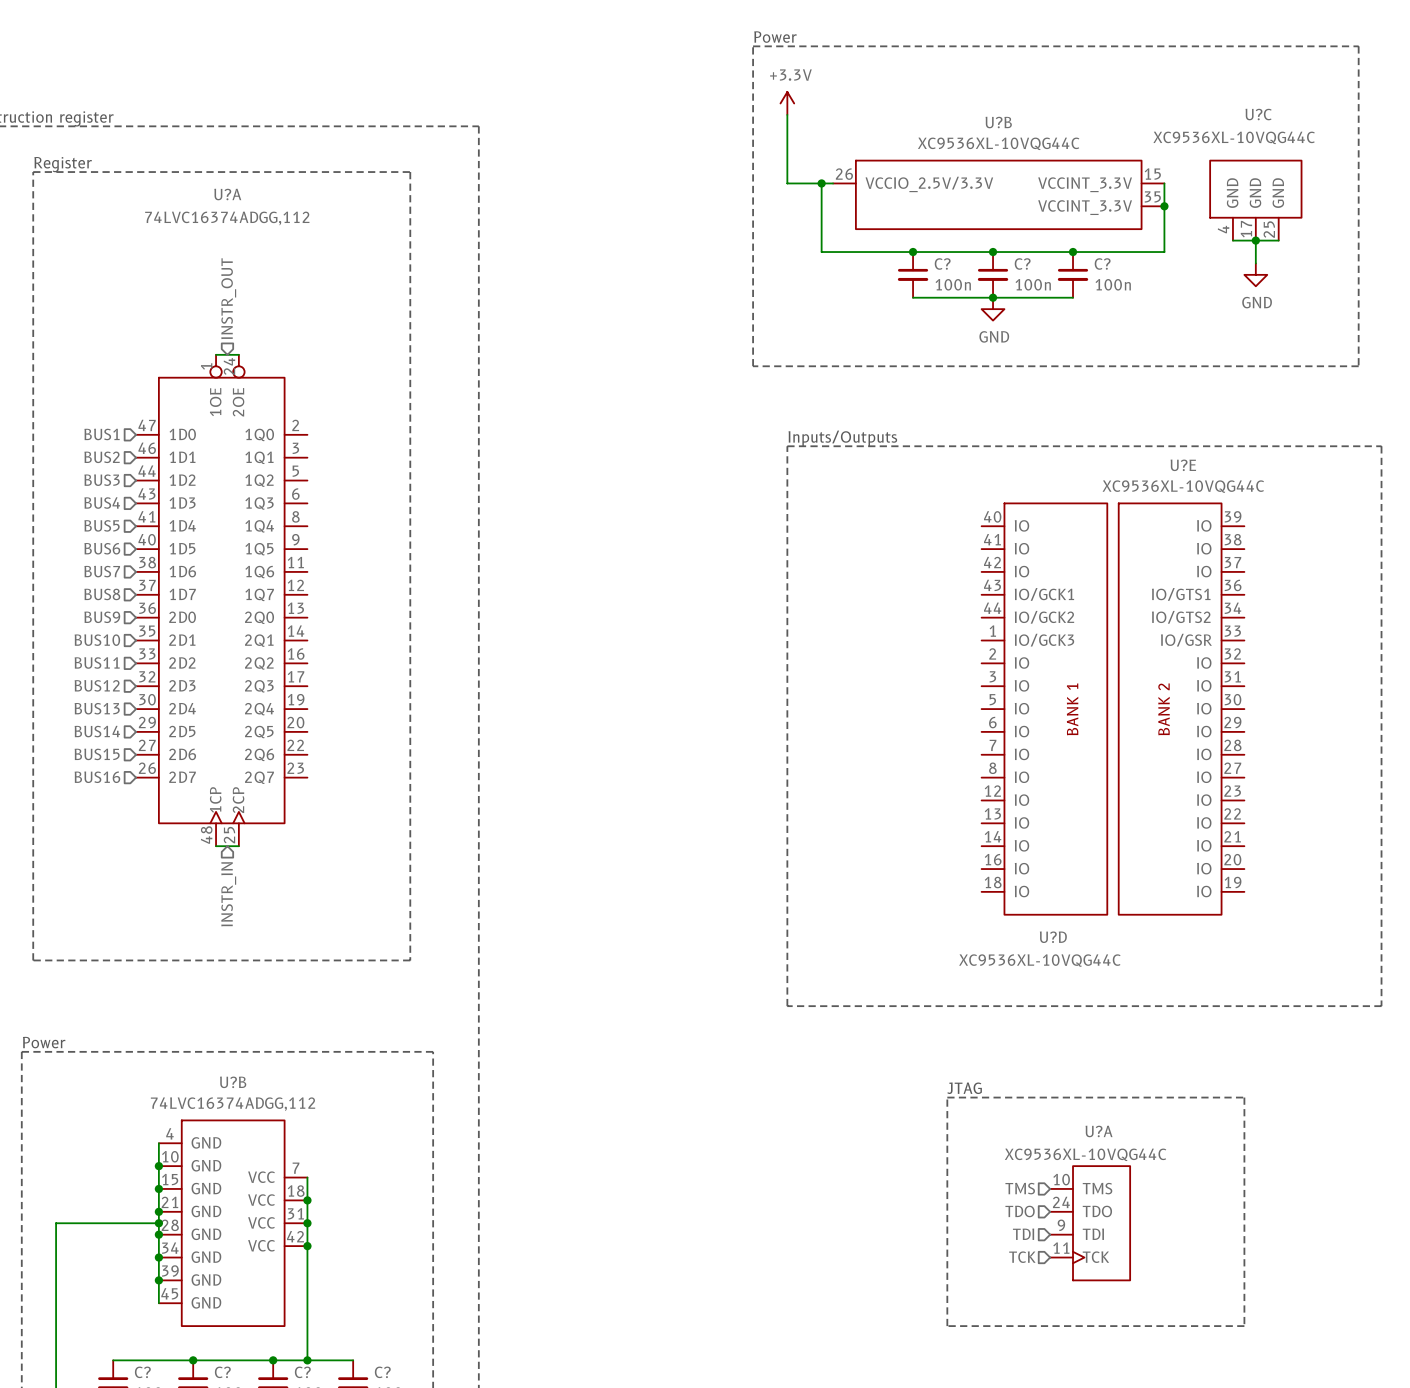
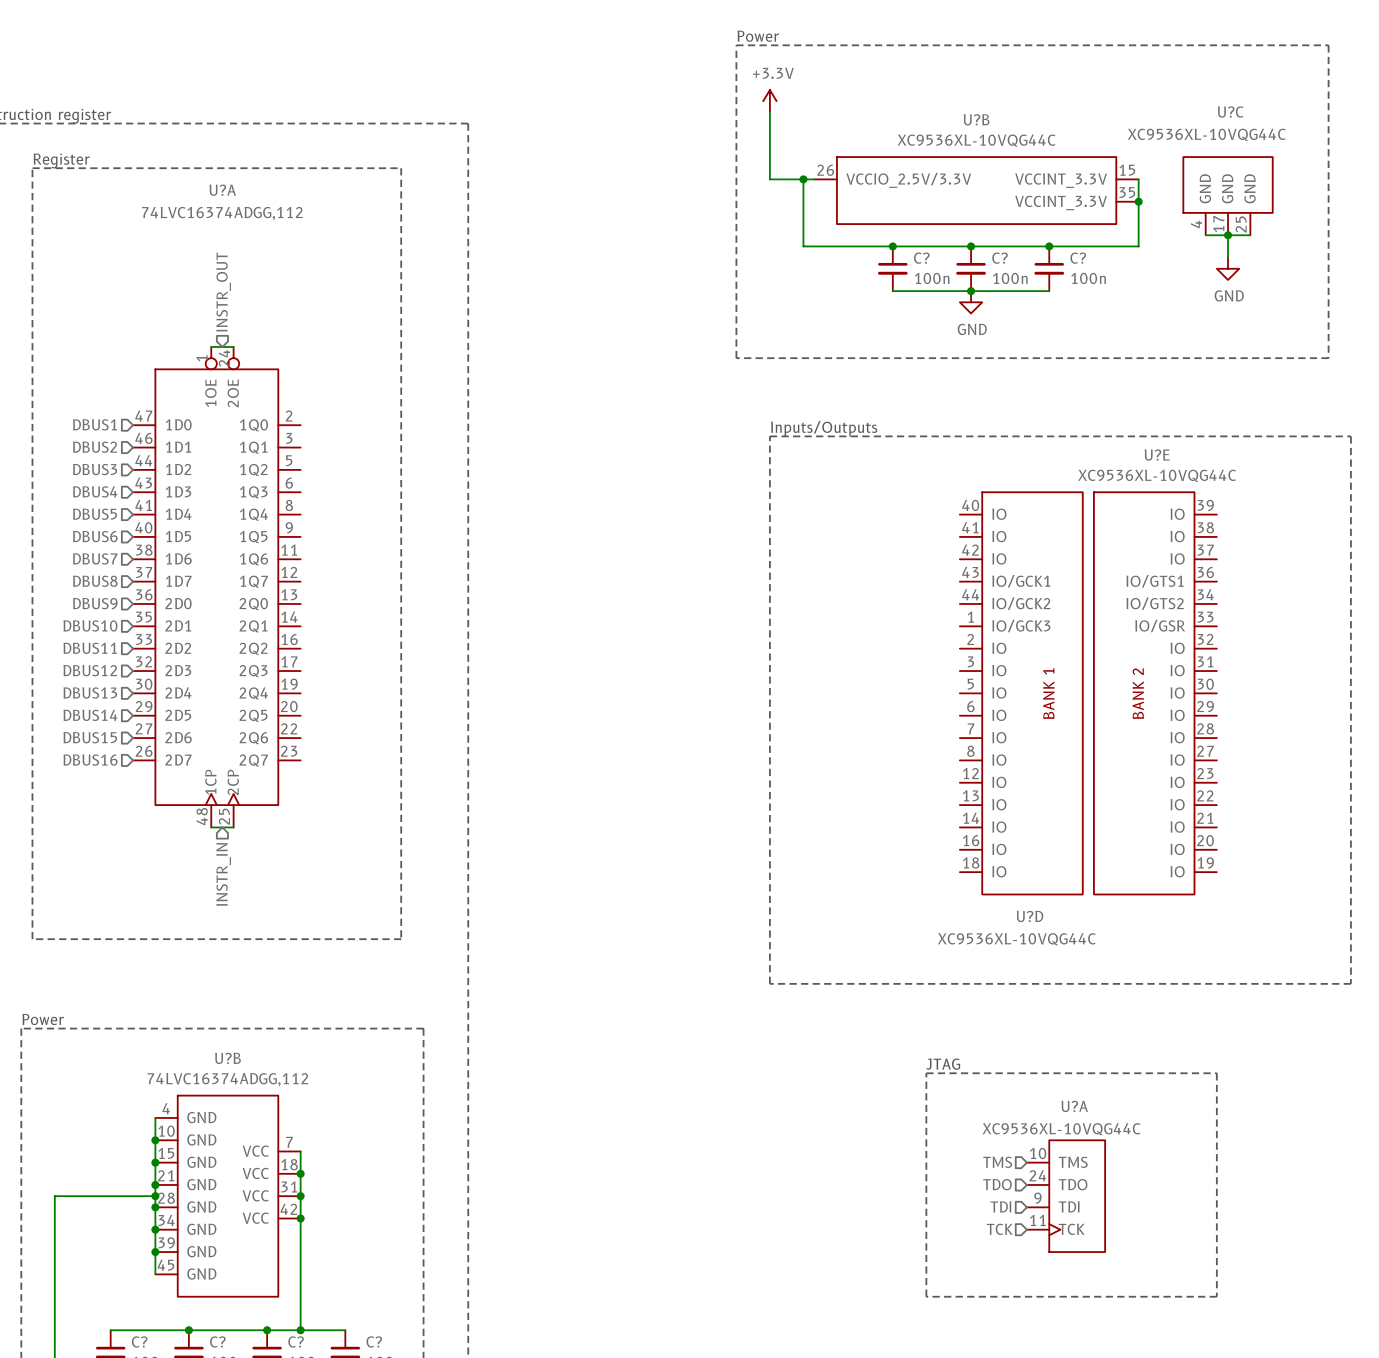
hierarchical label: BUS1 (102, 434) -> DBUS1 (95, 424)
hierarchical label: BUS2 (102, 457) -> DBUS2 (95, 447)
hierarchical label: BUS3 (102, 480) -> DBUS3 (95, 469)
hierarchical label: BUS4 (102, 503) -> DBUS4 (95, 491)
hierarchical label: BUS5 (102, 525) -> DBUS5 (95, 514)
hierarchical label: BUS6 (102, 548) -> DBUS6 (95, 536)
hierarchical label: BUS7 (102, 571) -> DBUS7 (95, 558)
hierarchical label: BUS8 (102, 594) -> DBUS8 (95, 581)
hierarchical label: BUS9 (102, 617) -> DBUS9 (95, 603)
hierarchical label: BUS10 (97, 640) -> DBUS10 (90, 625)
hierarchical label: BUS11 (97, 662) -> DBUS11 (90, 648)
hierarchical label: BUS12 (97, 685) -> DBUS12 (90, 670)
hierarchical label: BUS13 (97, 708) -> DBUS13 (90, 693)
hierarchical label: BUS14 (97, 731) -> DBUS14 (90, 715)
hierarchical label: BUS15 (97, 754) -> DBUS15 (90, 737)
hierarchical label: BUS16 (97, 777) -> DBUS16 (90, 760)

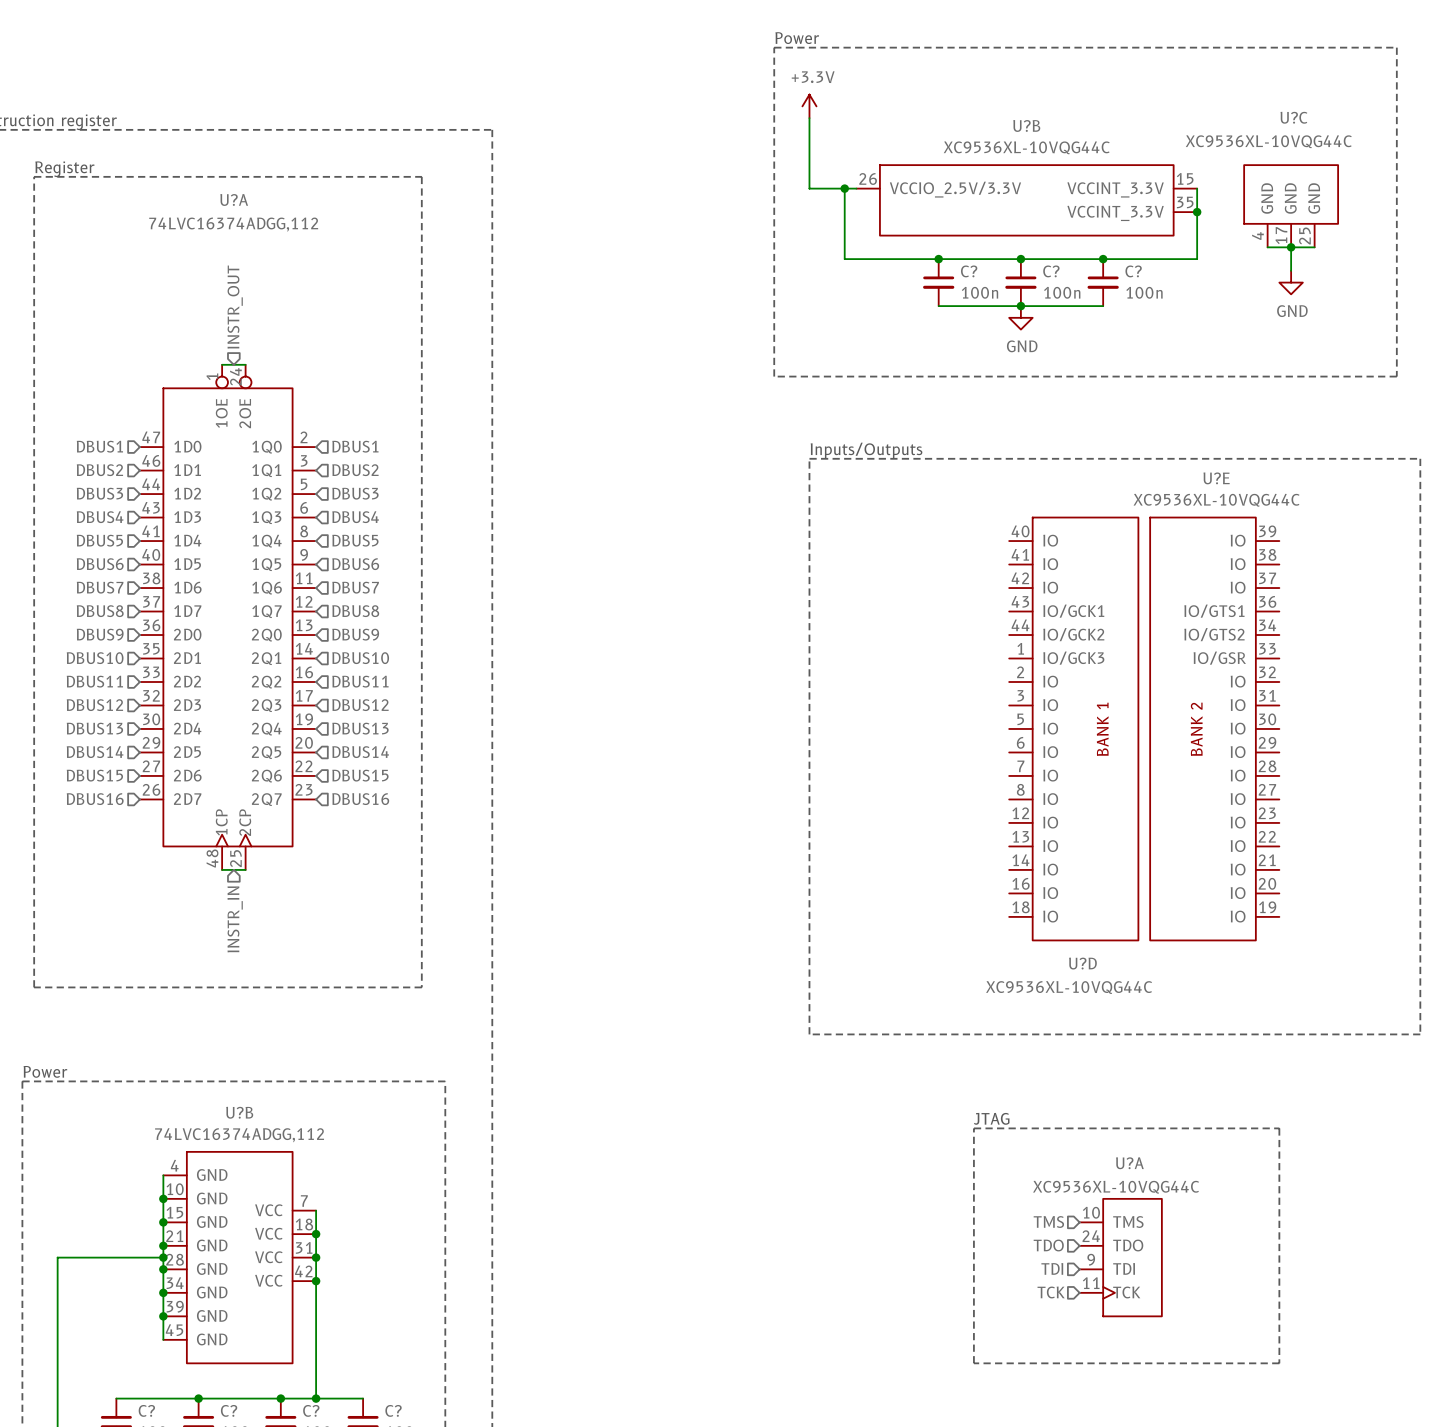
hierarchical label: none -> DBUS1 (355, 446)
hierarchical label: none -> DBUS2 (355, 470)
hierarchical label: none -> DBUS3 (355, 493)
hierarchical label: none -> DBUS4 (355, 517)
hierarchical label: none -> DBUS5 (355, 540)
hierarchical label: none -> DBUS6 (355, 564)
hierarchical label: none -> DBUS7 (355, 587)
hierarchical label: none -> DBUS8 (355, 611)
hierarchical label: none -> DBUS9 (355, 634)
hierarchical label: none -> DBUS10 (360, 658)
hierarchical label: none -> DBUS11 (360, 681)
hierarchical label: none -> DBUS12 (360, 705)
hierarchical label: none -> DBUS13 (360, 728)
hierarchical label: none -> DBUS14 (360, 752)
hierarchical label: none -> DBUS15 (360, 775)
hierarchical label: none -> DBUS16 (360, 799)

